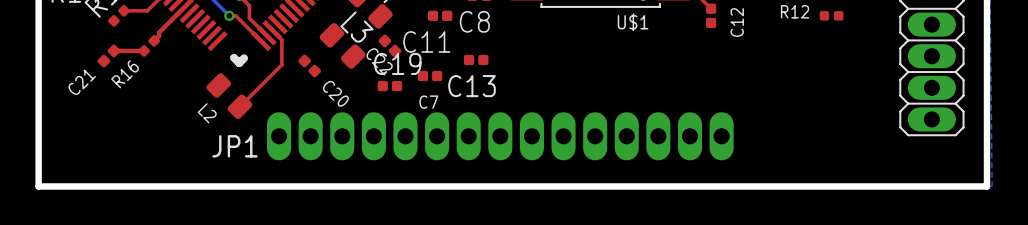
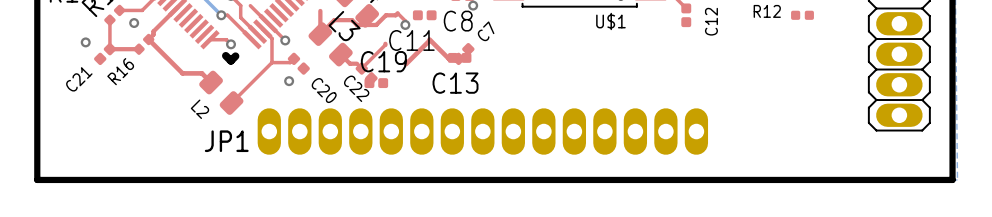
top track: none -> (250, 5) (285, 40)
via: none -> (473, 5)
top track: none -> (320, 10) (320, 34) (334, 20) (352, 20) (356, 24) (376, 24) (385, 15) (395, 15) (397, 13) (405, 20) (405, 24)
top track: none -> (109, 20) (109, 49)
via: none -> (134, 23)
via: none -> (405, 24)
top track: none -> (148, 39) (182, 73) (201, 73) (211, 82)
top track: none -> (209, 39) (226, 39) (231, 44)
via: none -> (285, 40)
via: none -> (85, 42)
via: none -> (231, 44)
C22 position: (389, 45) -> (366, 73)
top track: none -> (385, 43) (361, 68) (356, 63) (349, 63) (340, 54)
top track: none -> (293, 58) (290, 62) (271, 62)
top track: none -> (458, 58) (448, 58) (429, 39) (405, 64)
C7 rotation: 0° (430, 76) -> 45° counterclockwise (463, 54)
C7 position: (430, 76) -> (463, 54)
via: none -> (289, 81)
C7 name position: C7 (428, 102) -> C7 (486, 31)

